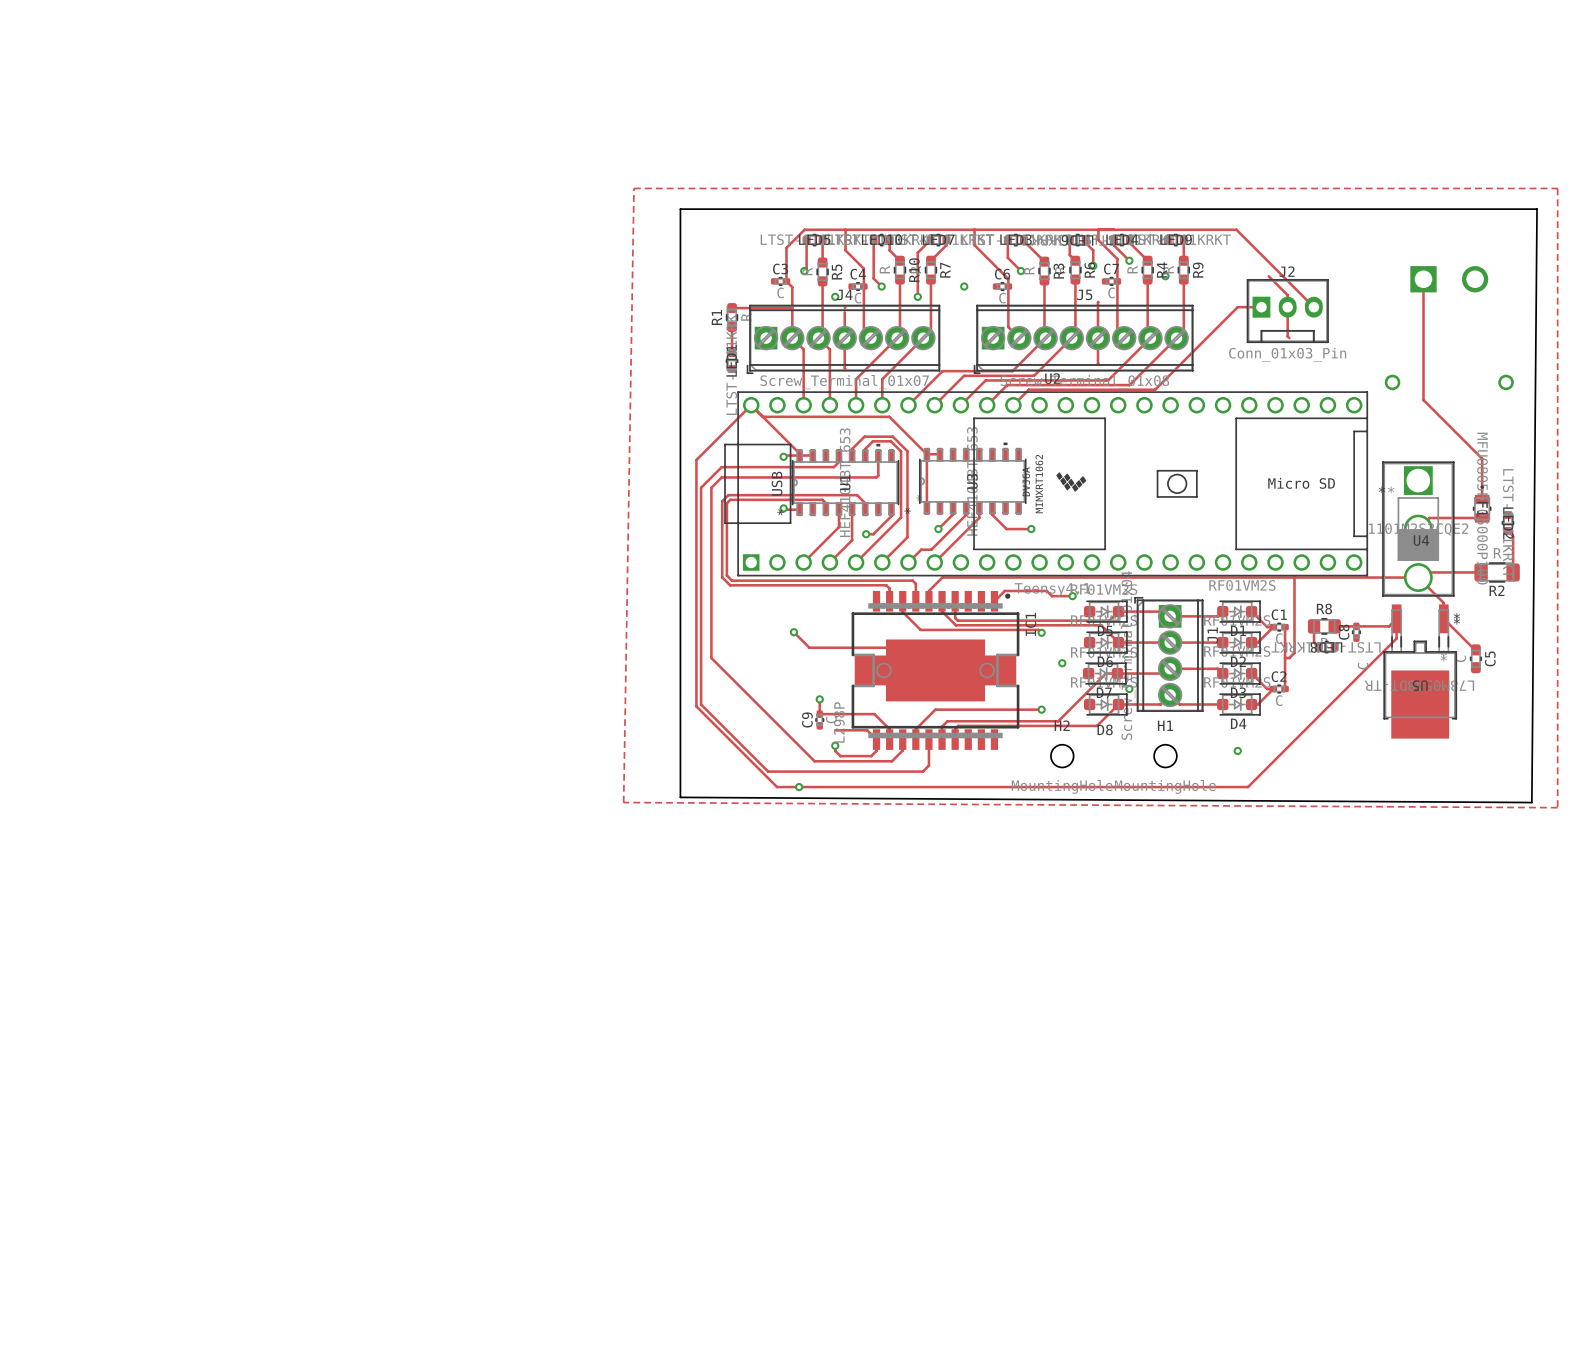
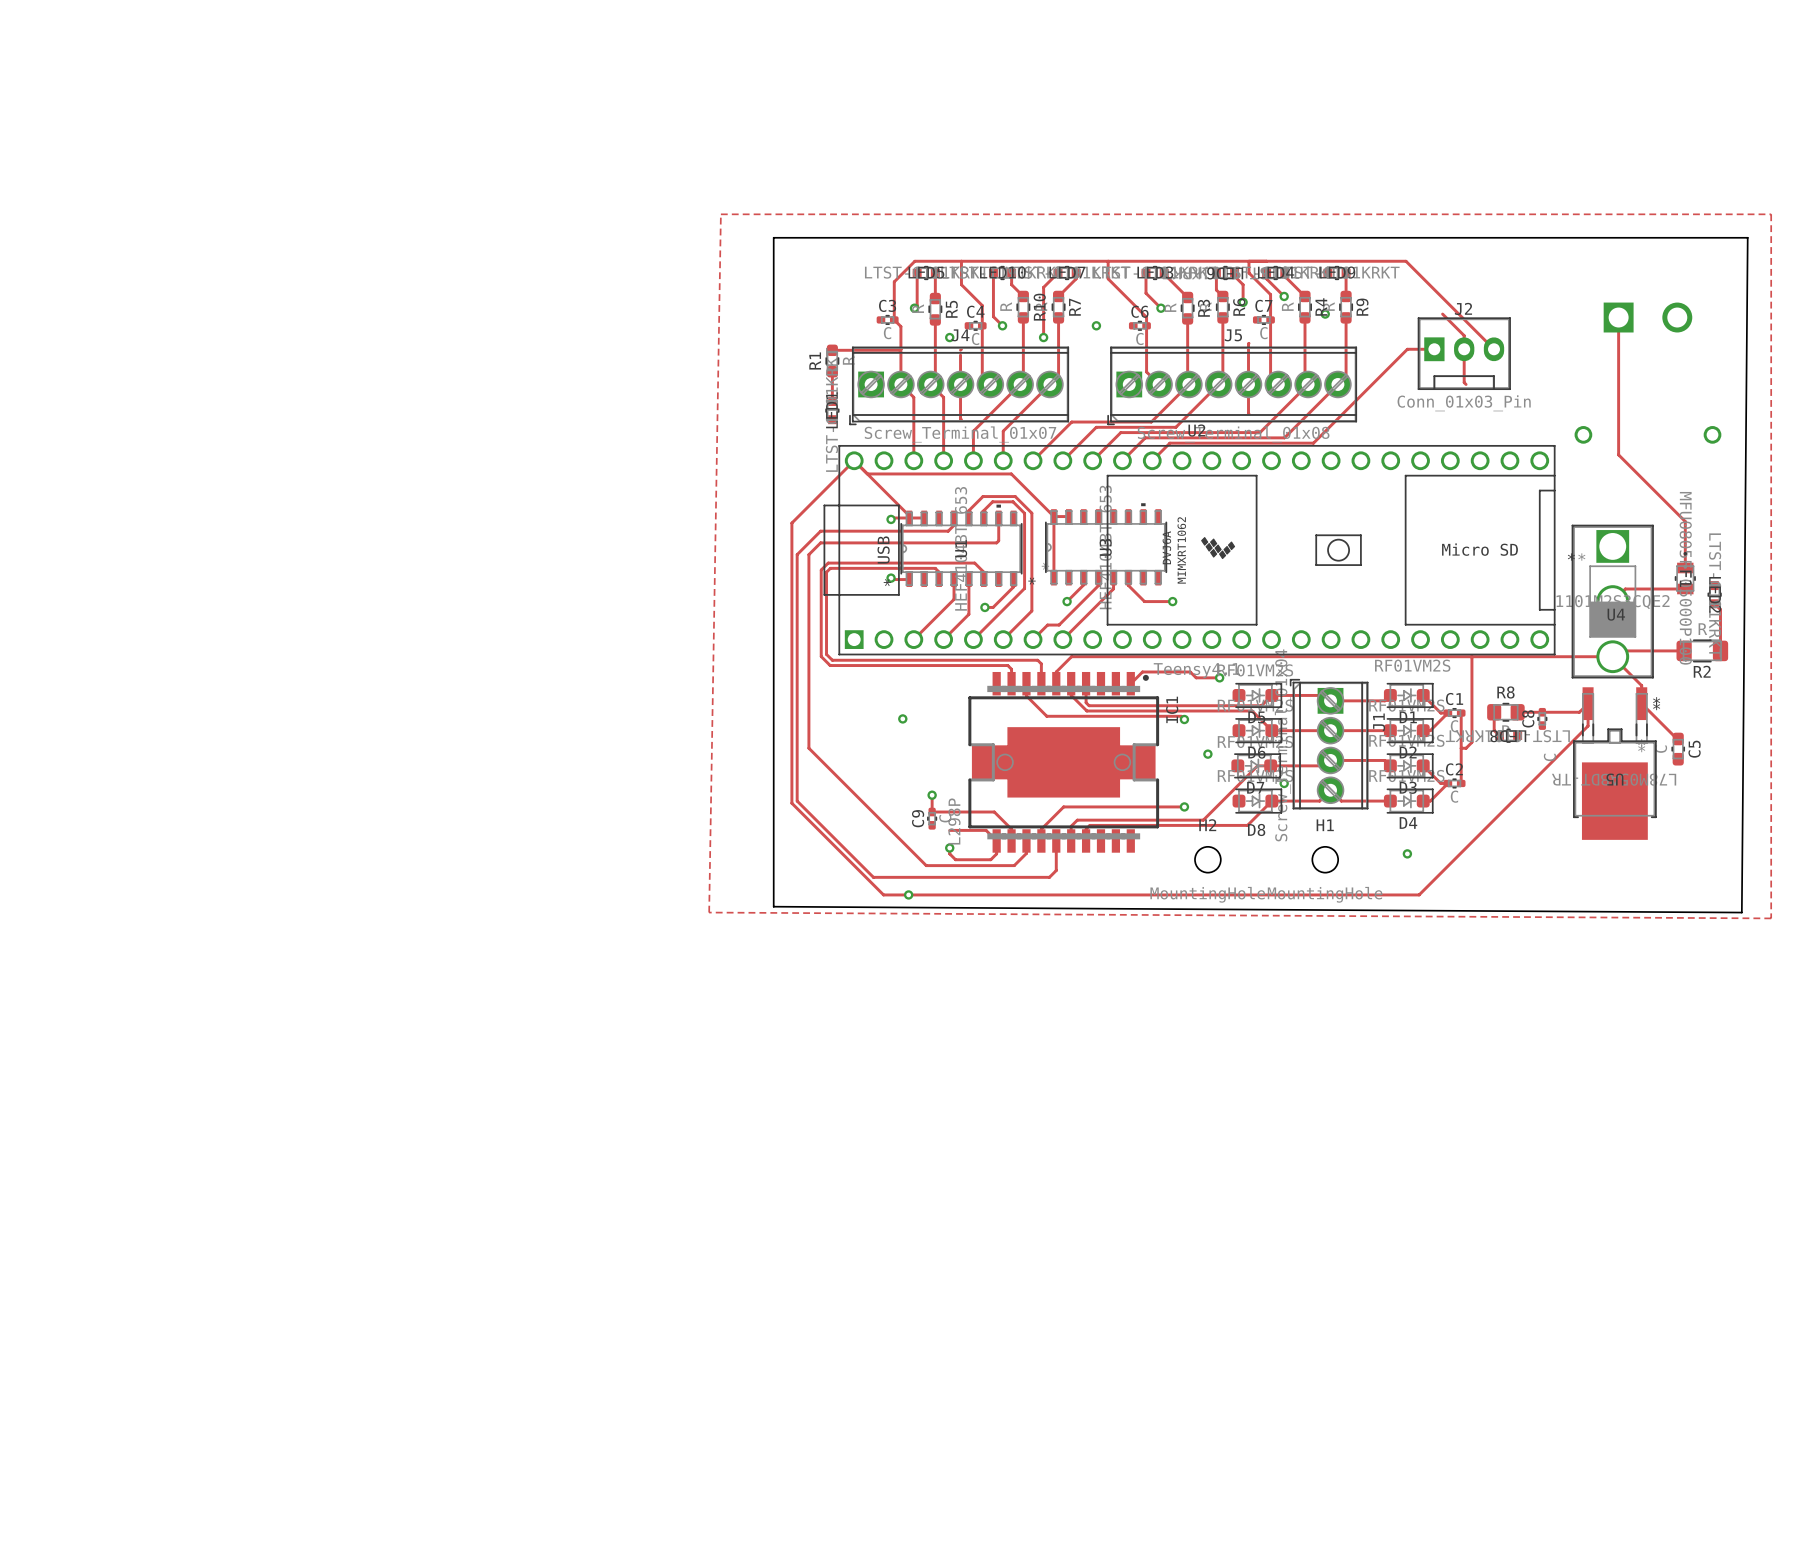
track: (793, 632) (809, 647) (912, 647) (935, 670) -> none

